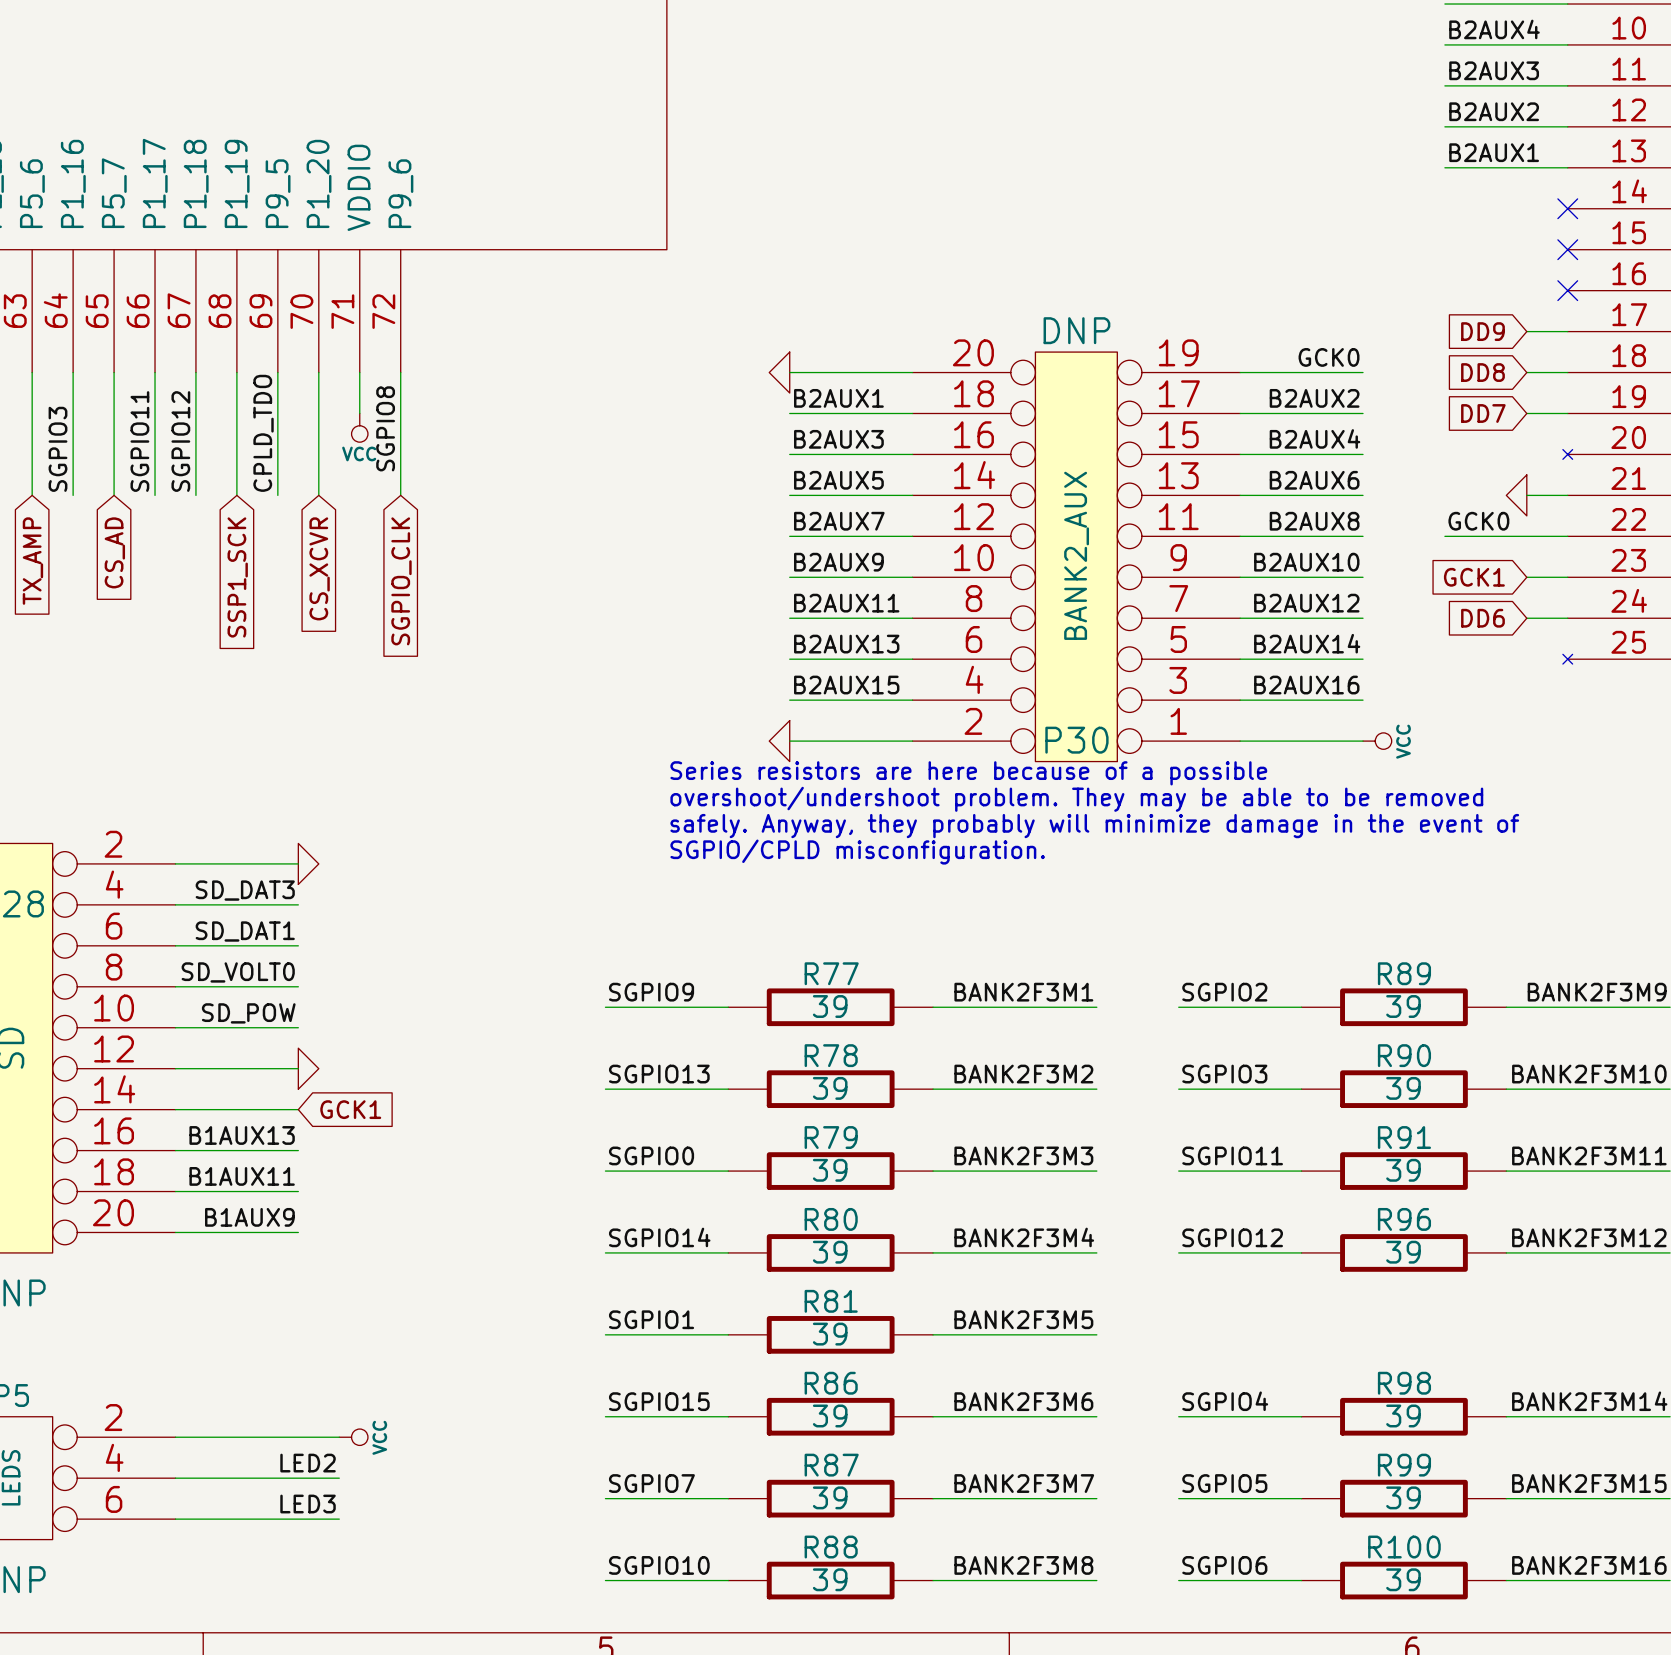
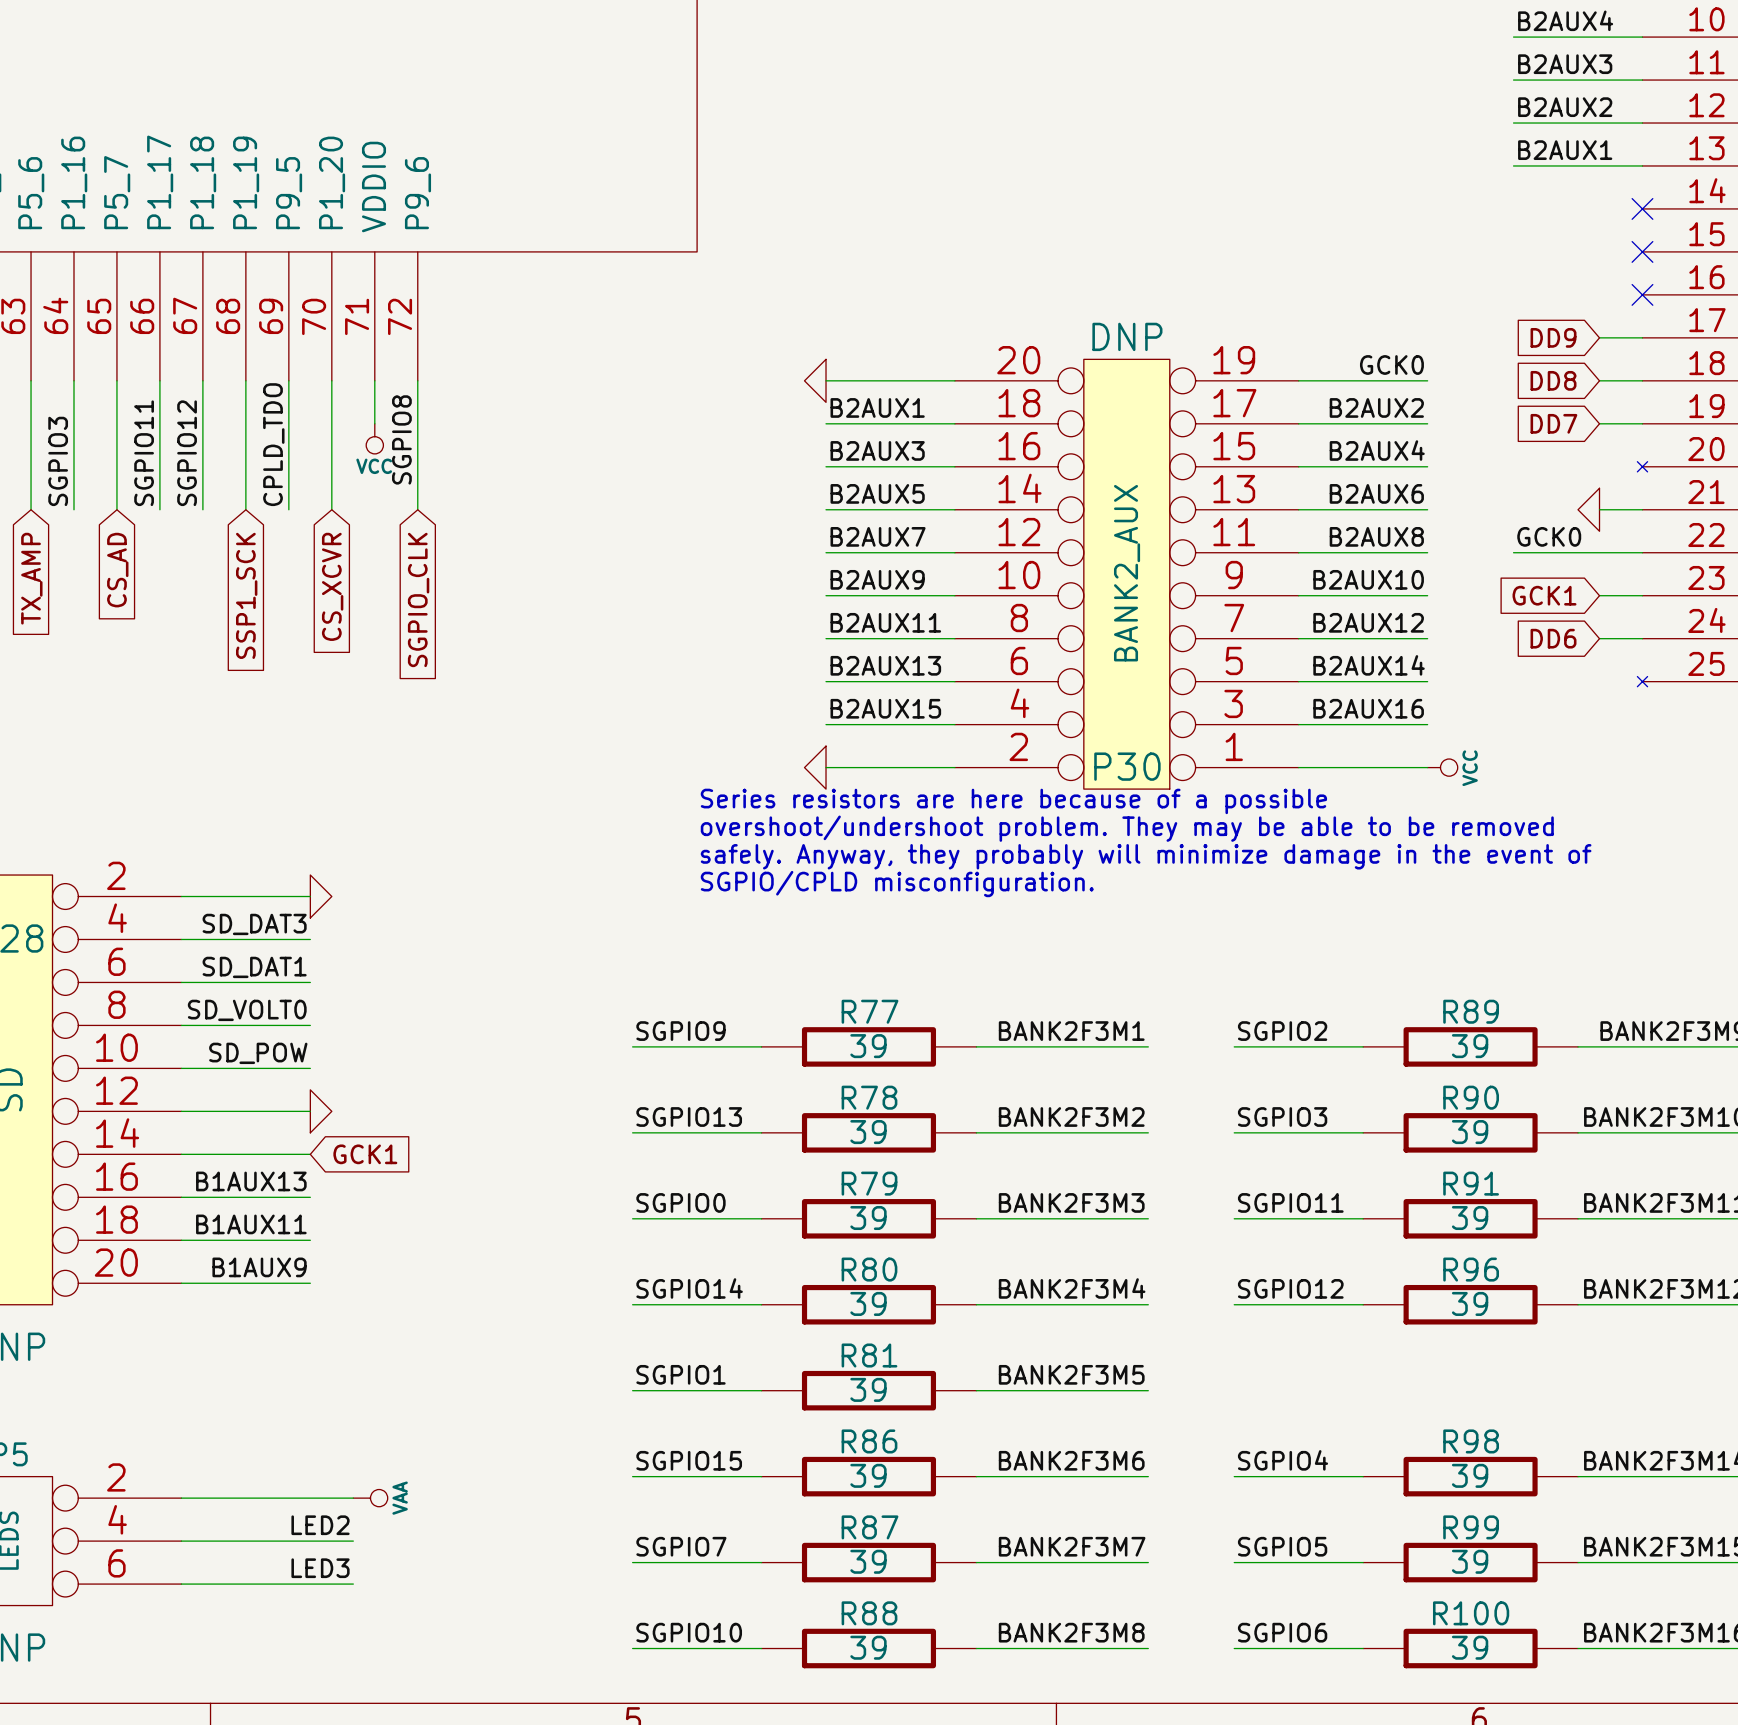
power symbol: VCC (353, 1437) -> VAA (370, 1498)

